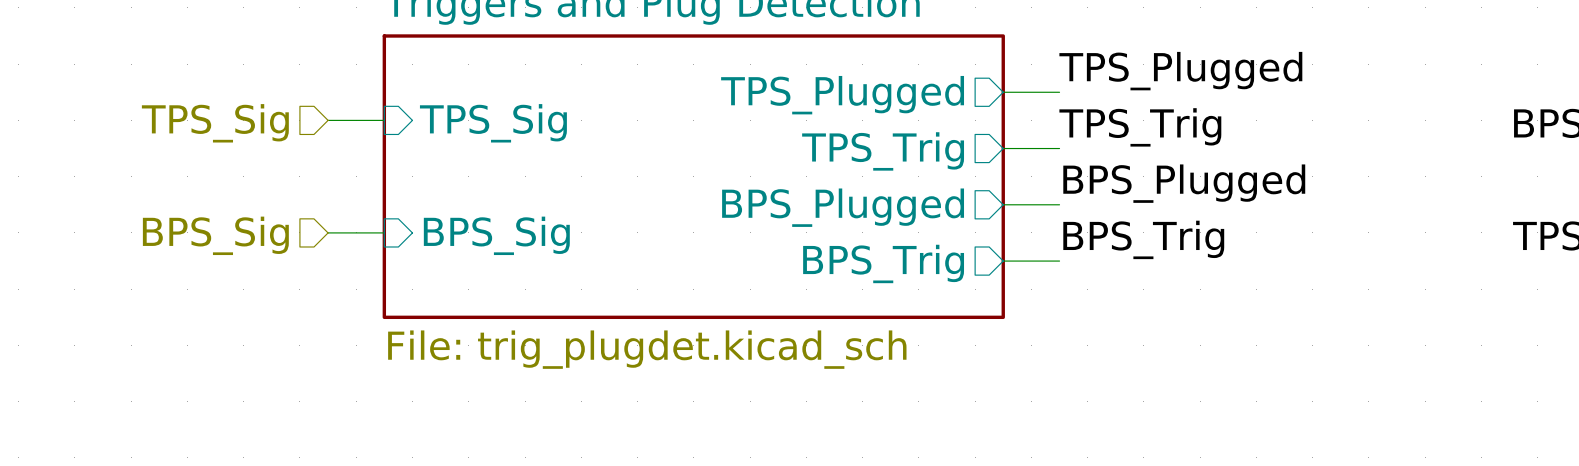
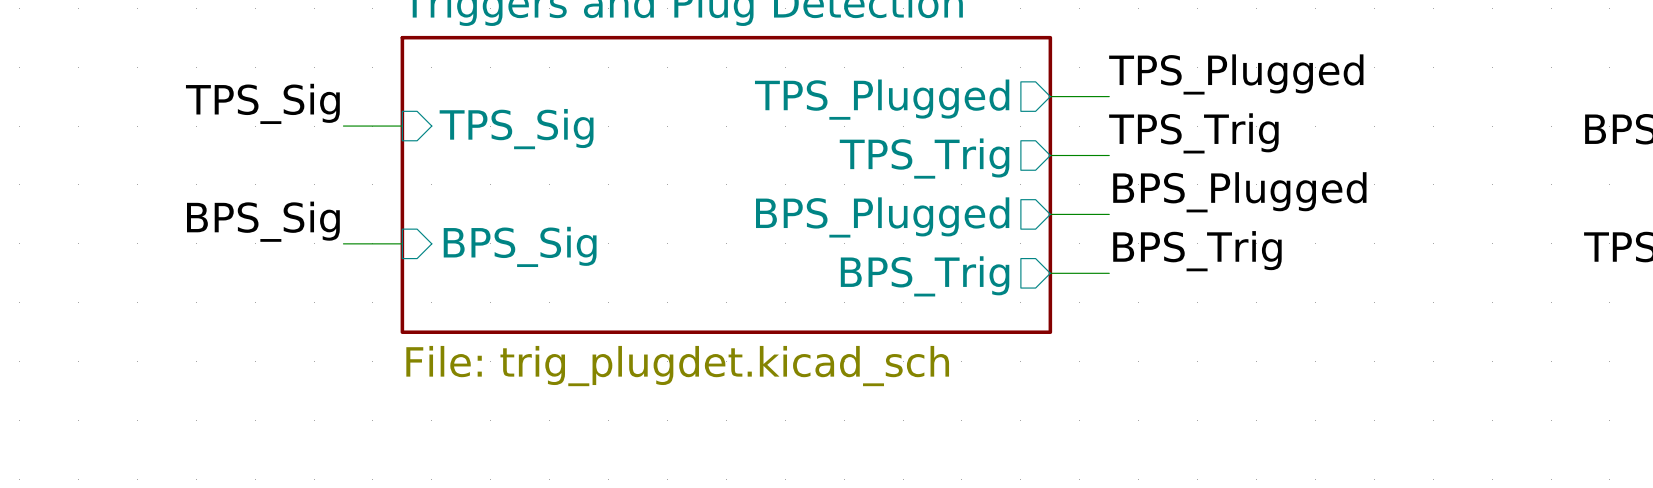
label: none -> TPS_Sig (262, 103)
hierarchical label: TPS_Sig (215, 123) -> none
label: none -> BPS_Sig (263, 221)
hierarchical label: BPS_Sig (215, 235) -> none

